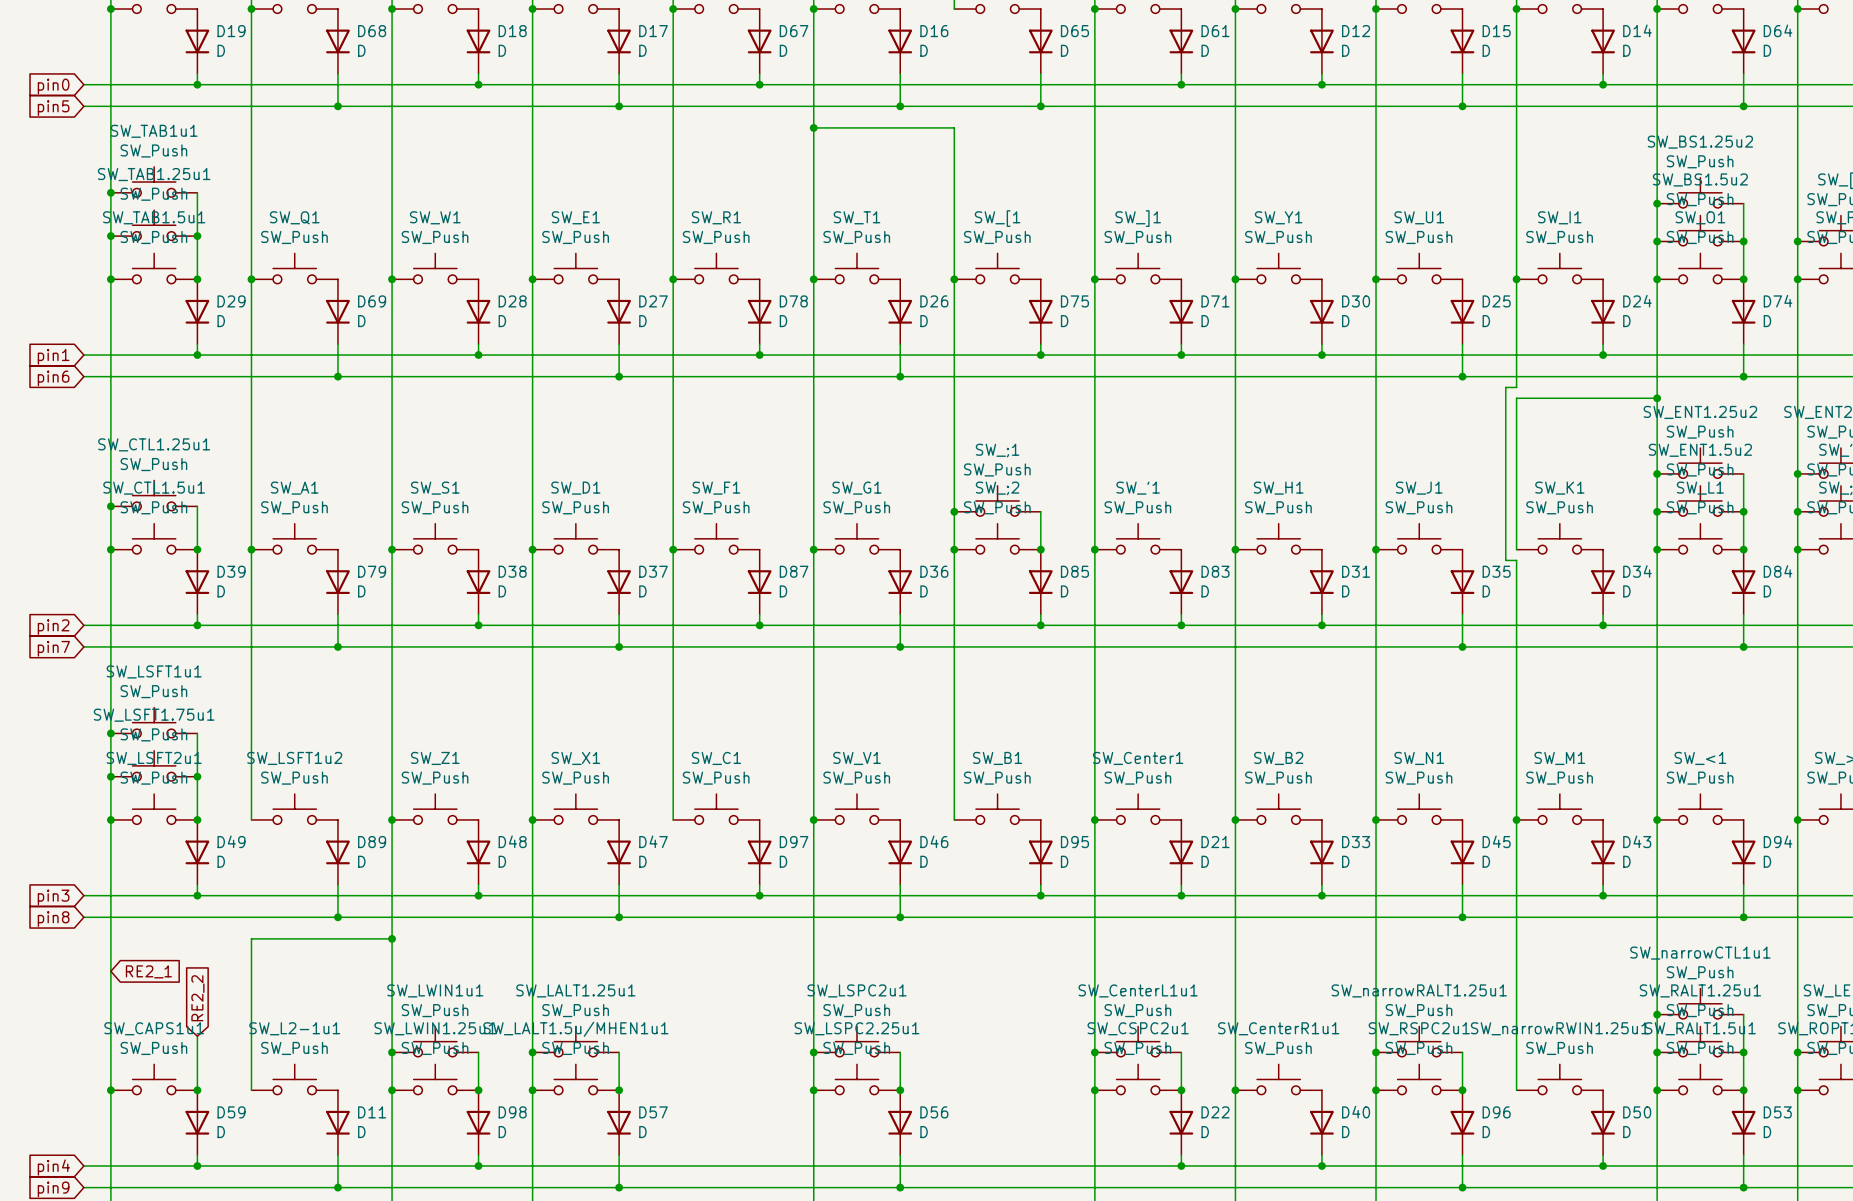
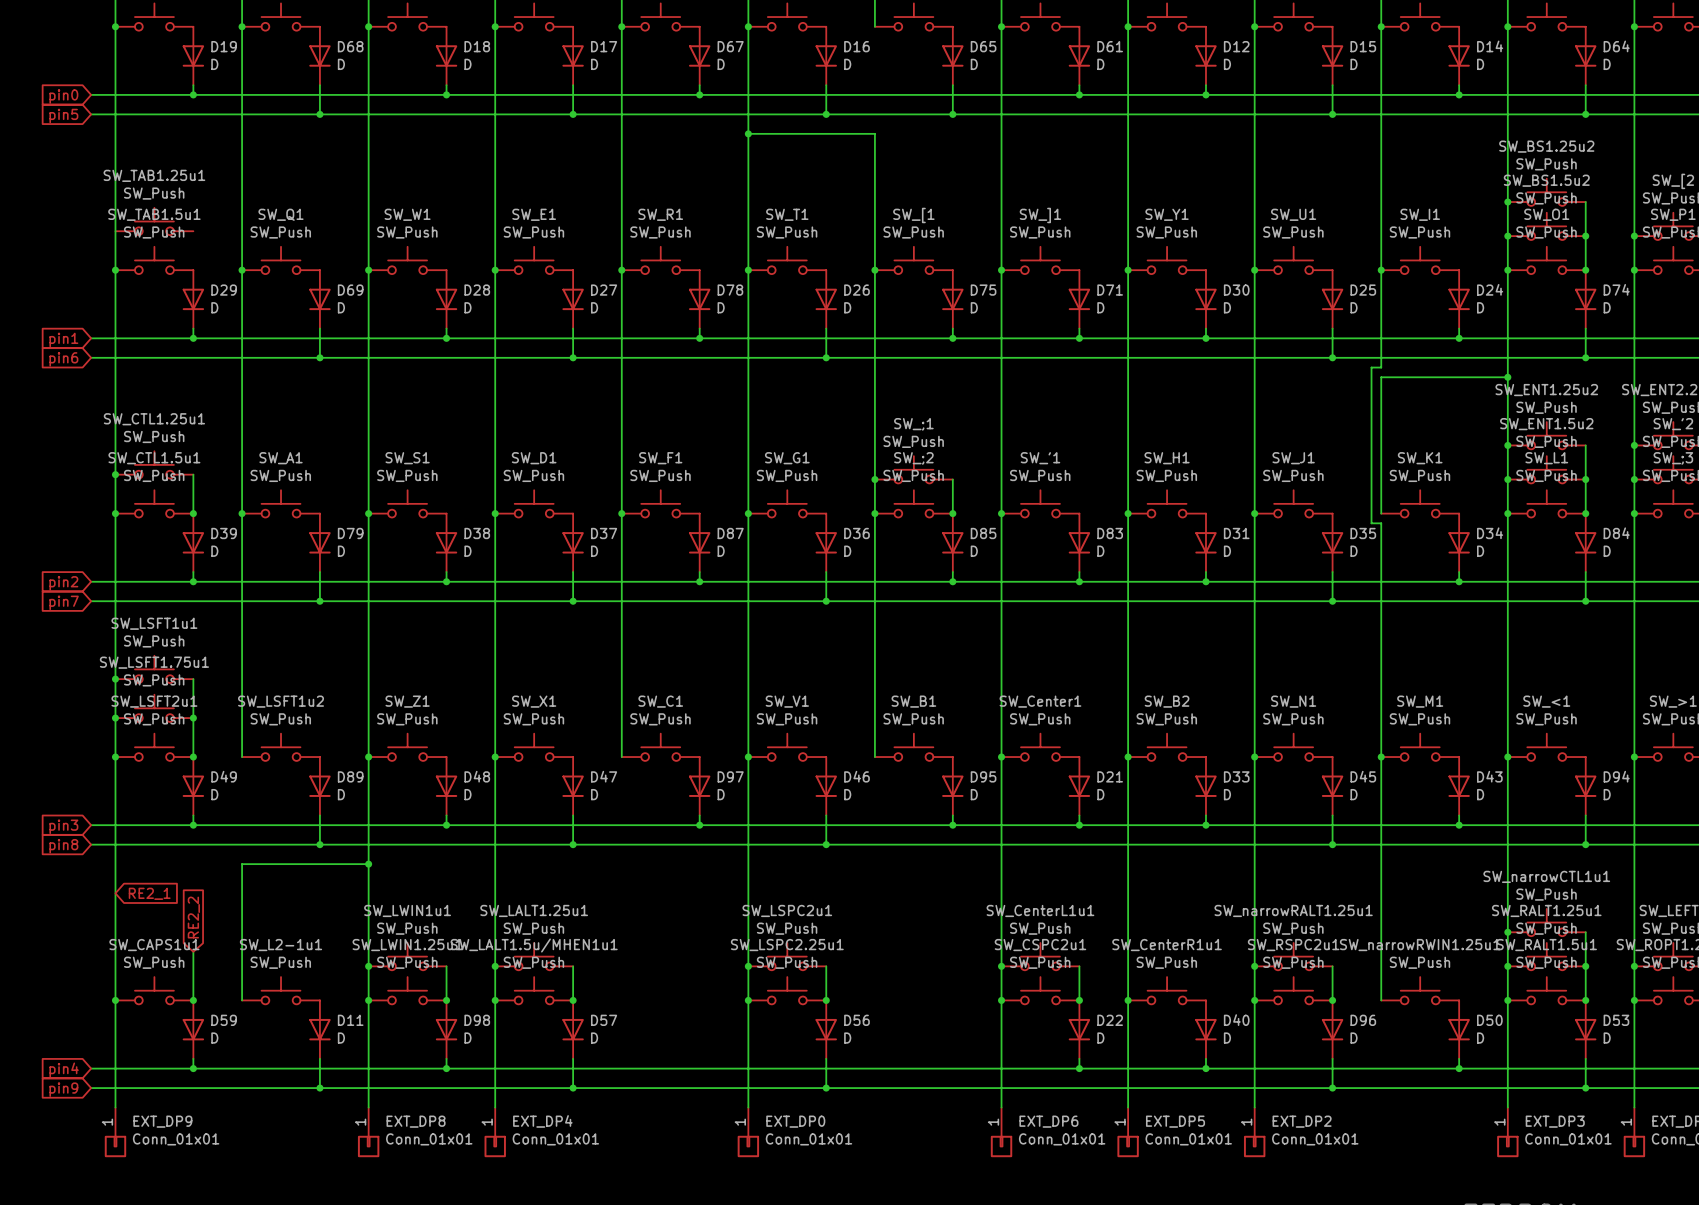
SW_TAB1u1: SW_Push (154, 182) -> none
junction: (110, 192) -> none
wire: (197, 192) (197, 279) -> none
junction: (110, 236) -> none
junction: (197, 236) -> none
junction: (197, 279) -> none

